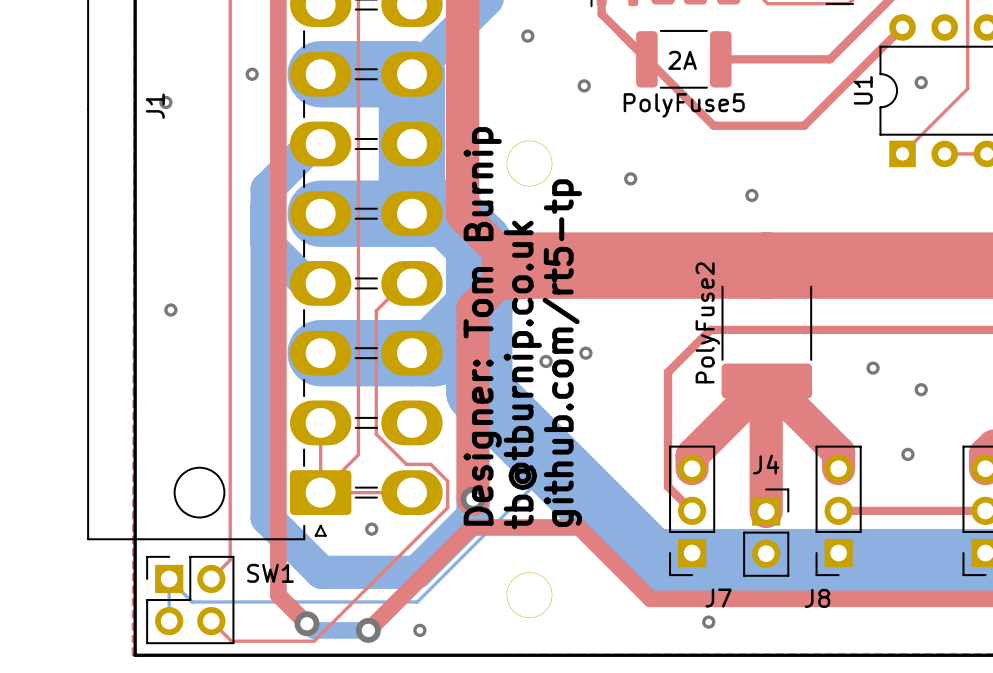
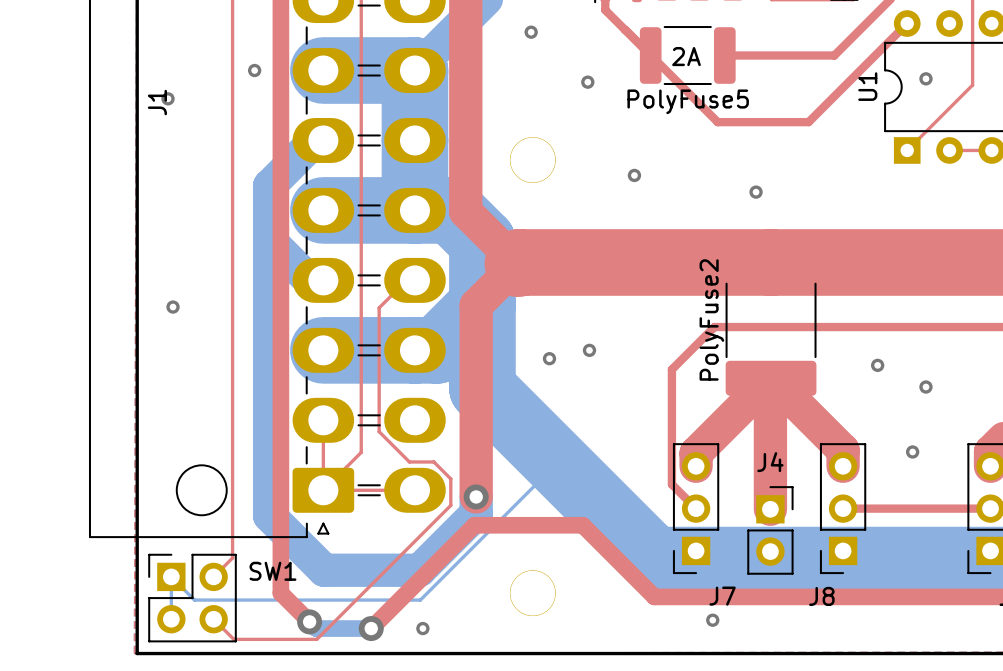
text: Designer: Tom Burnip (482, 326) -> none
text: github.com/rt5-tp (562, 353) -> none
text: tb@tburnip.co.uk (522, 375) -> none
via: (371, 529) -> none

